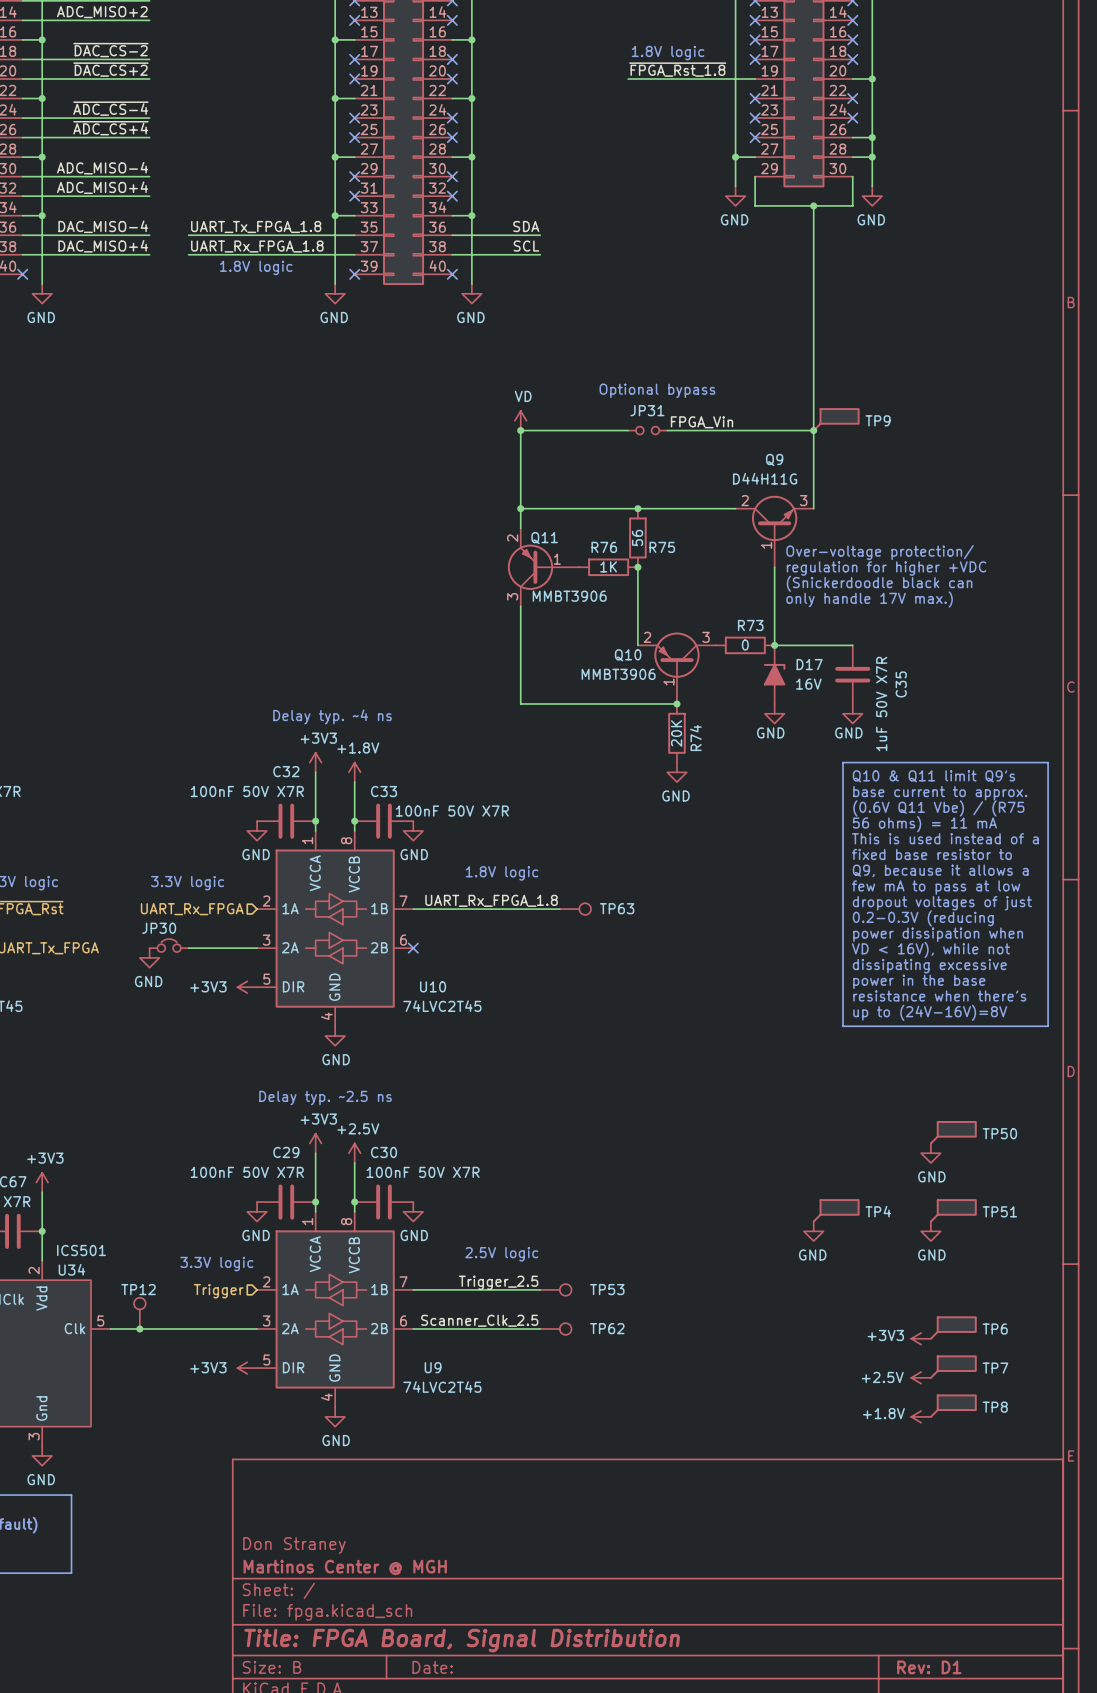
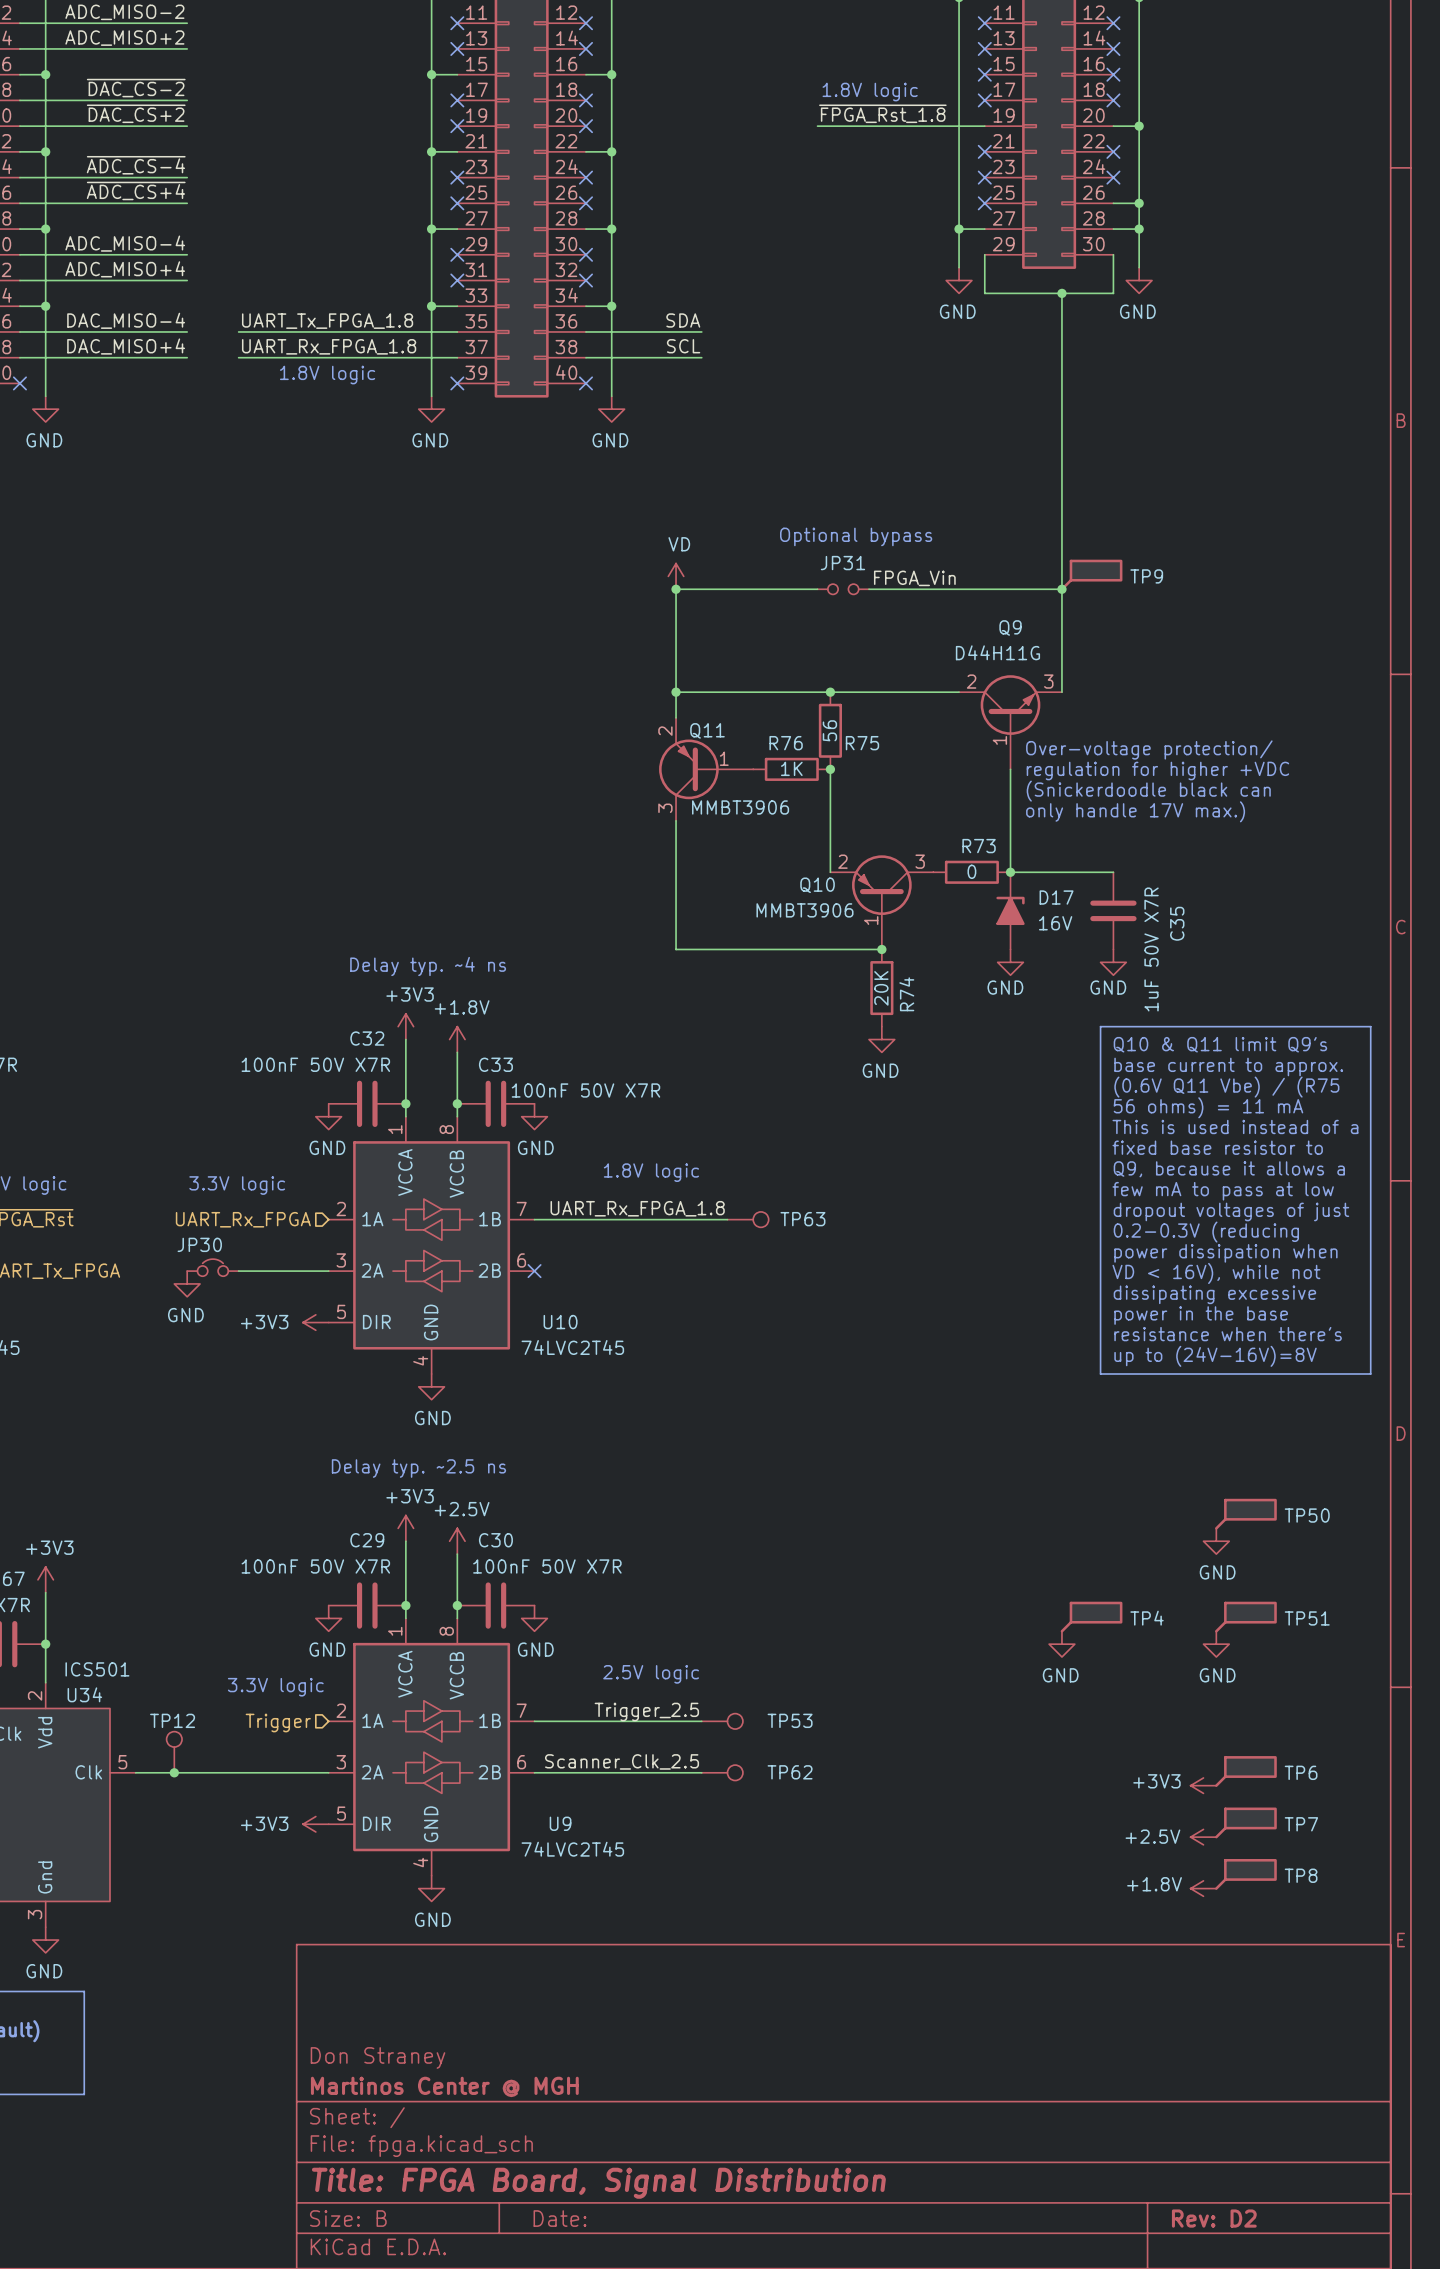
title block: Rev: D1 (929, 1667) -> Rev: D2 (1214, 2218)

